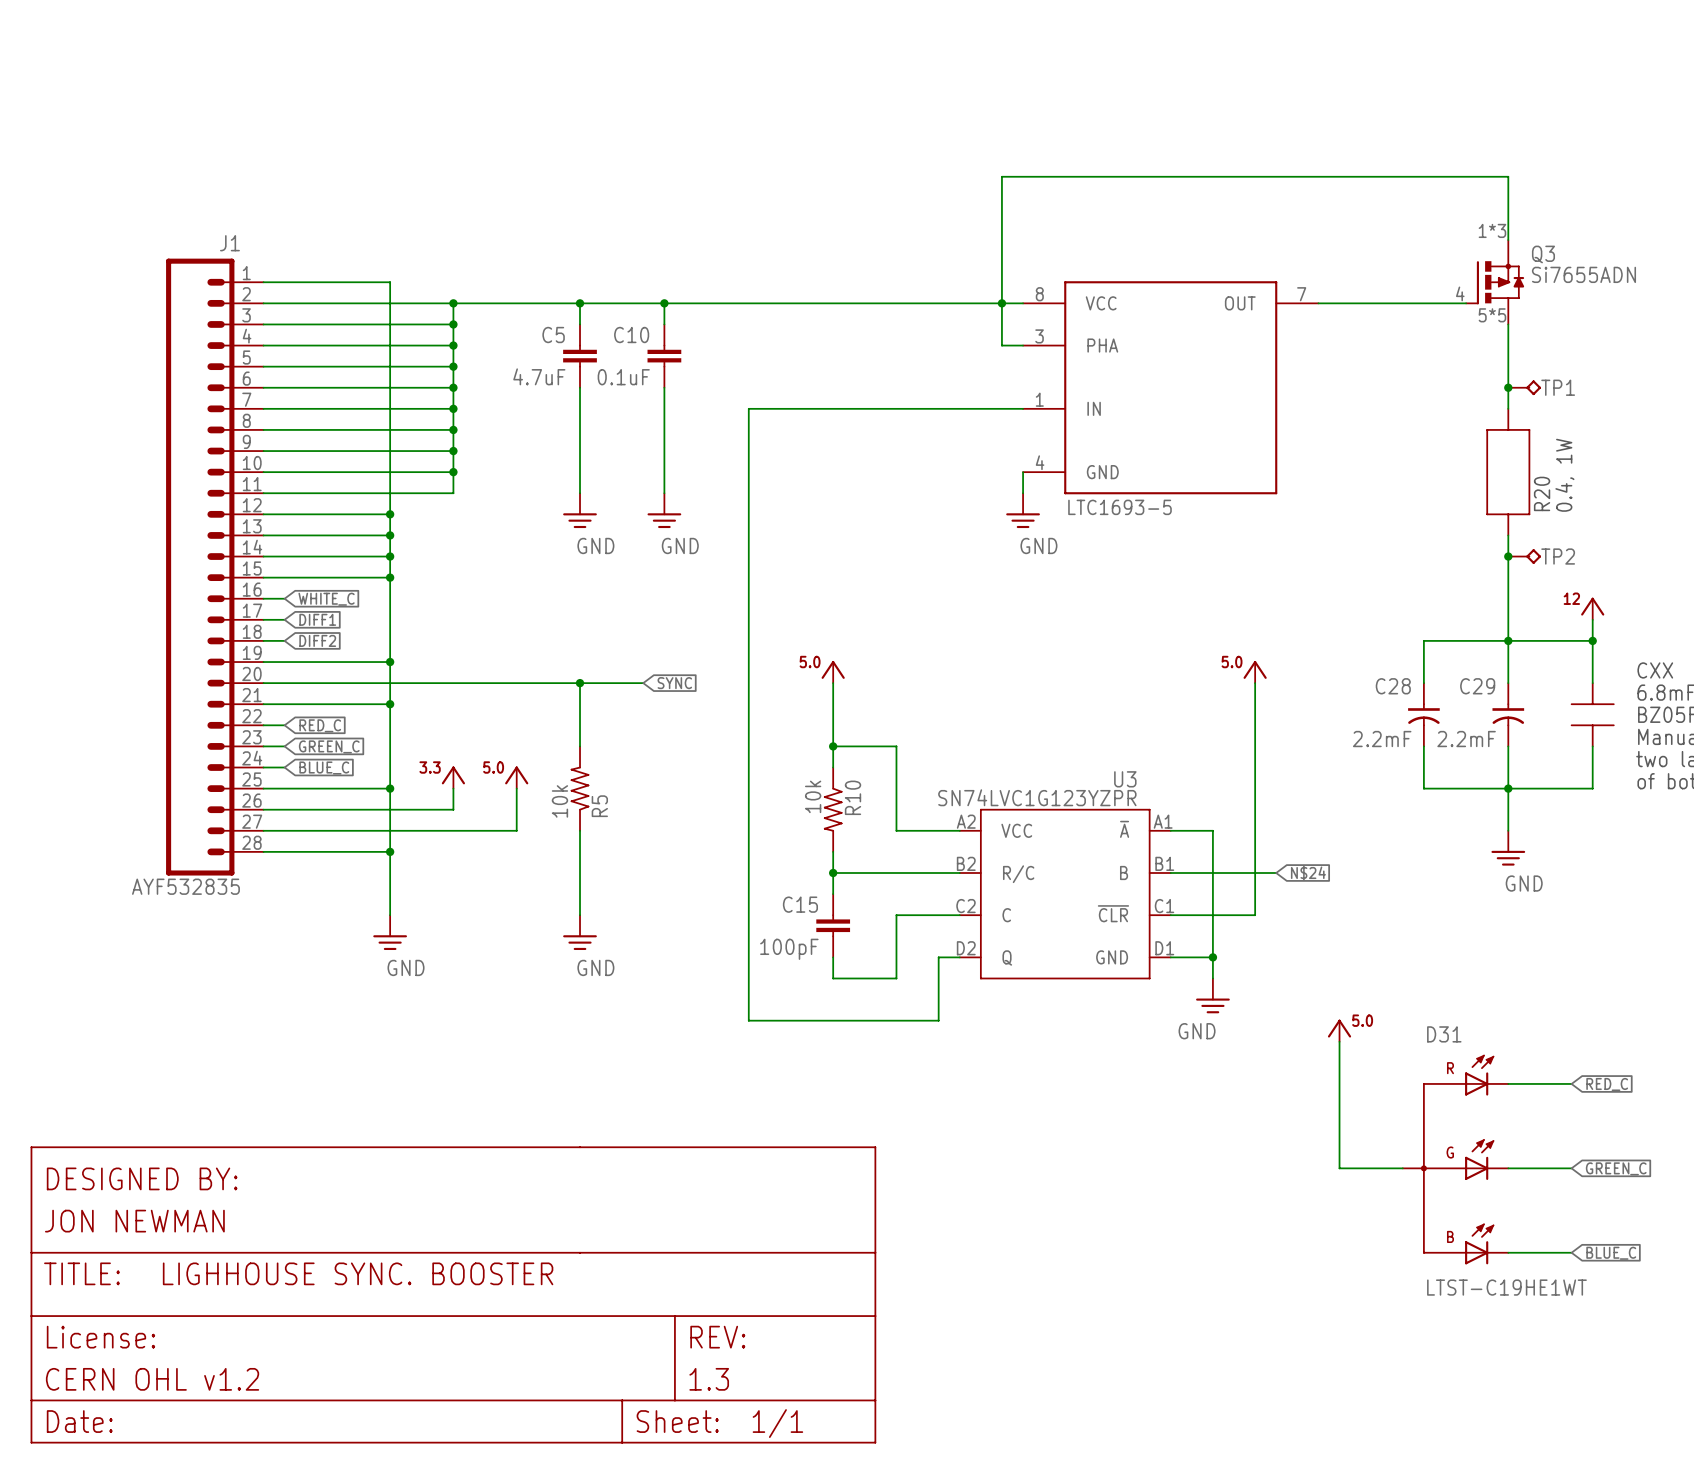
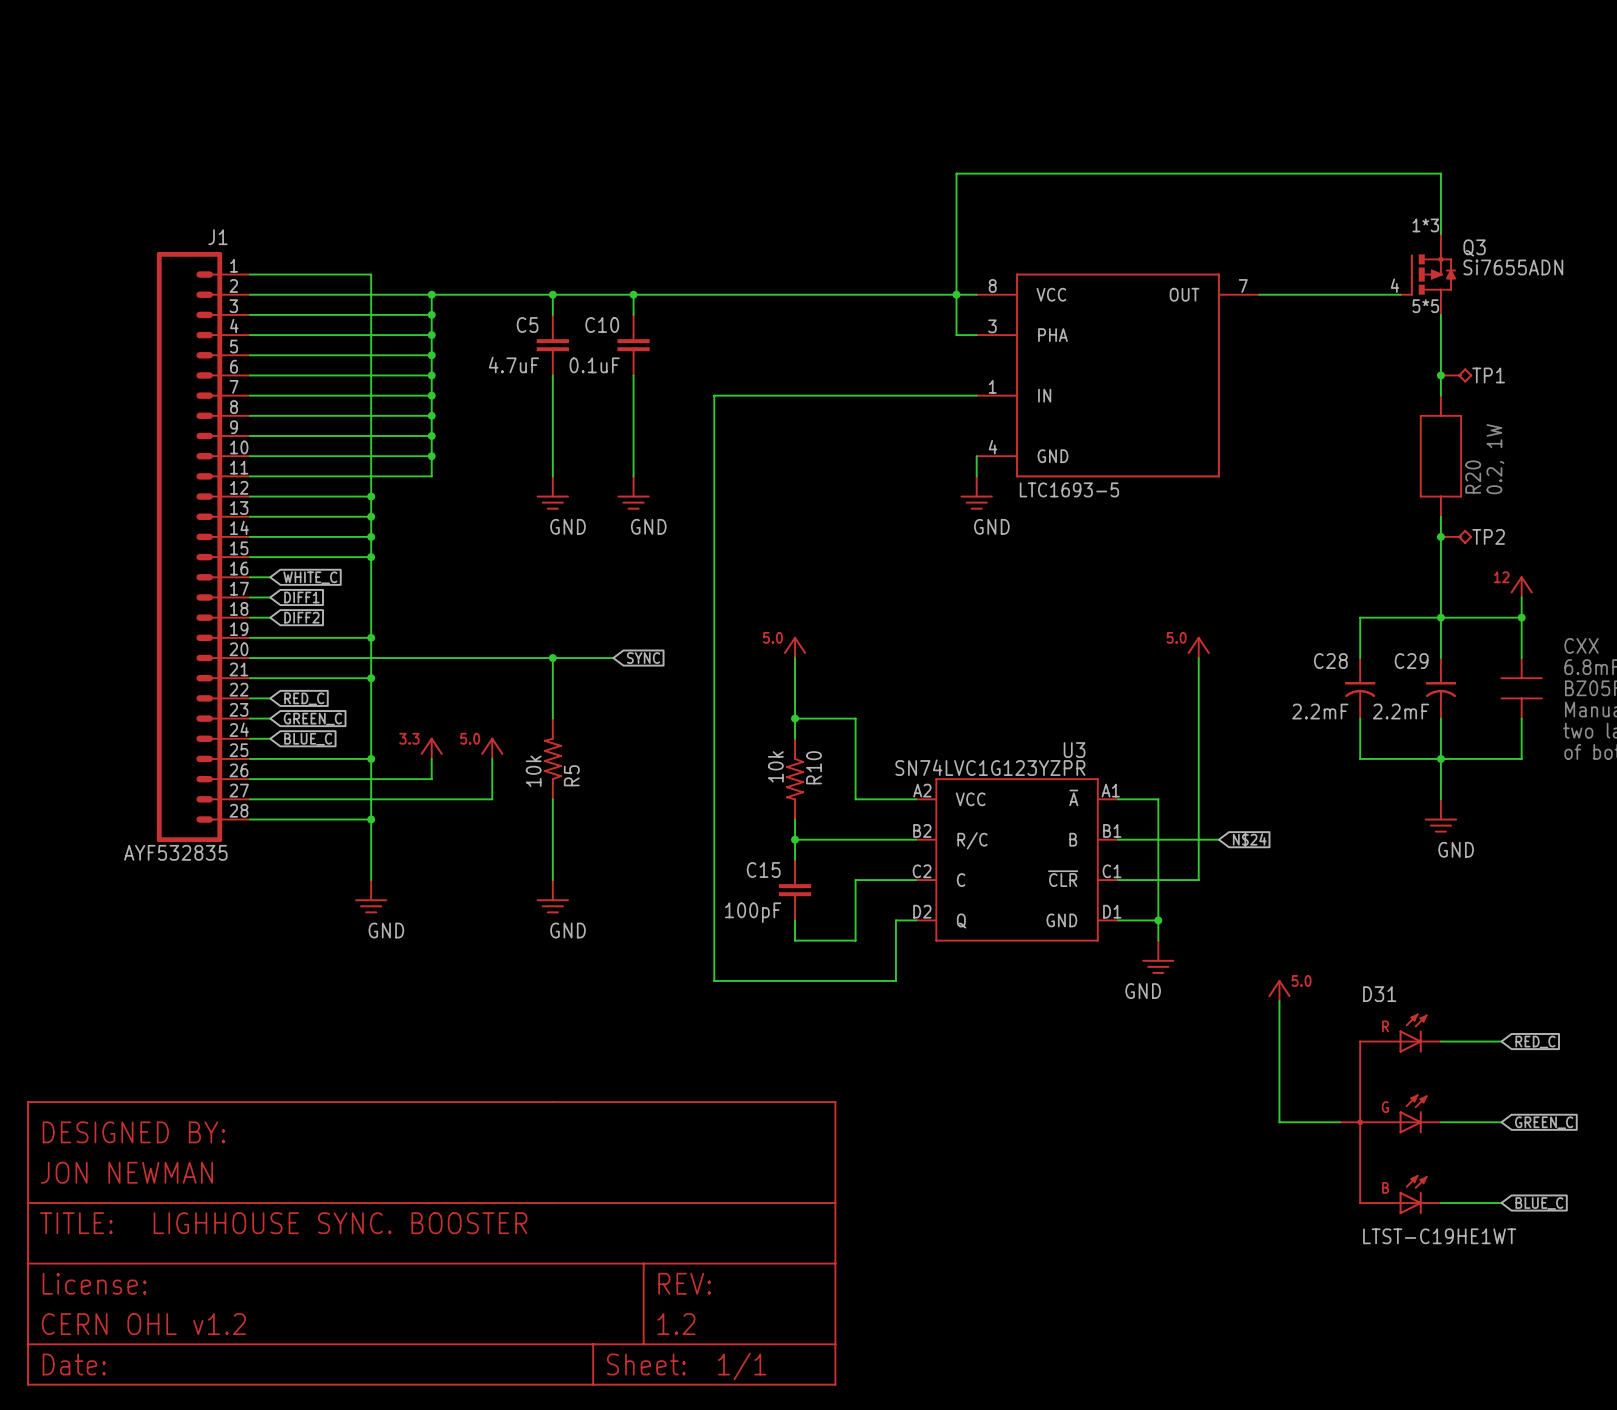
text: 0.4, 1W (1564, 475) -> 0.2, 1W (1495, 459)
part text: 1.3 (709, 1379) -> 1.2 (676, 1324)

